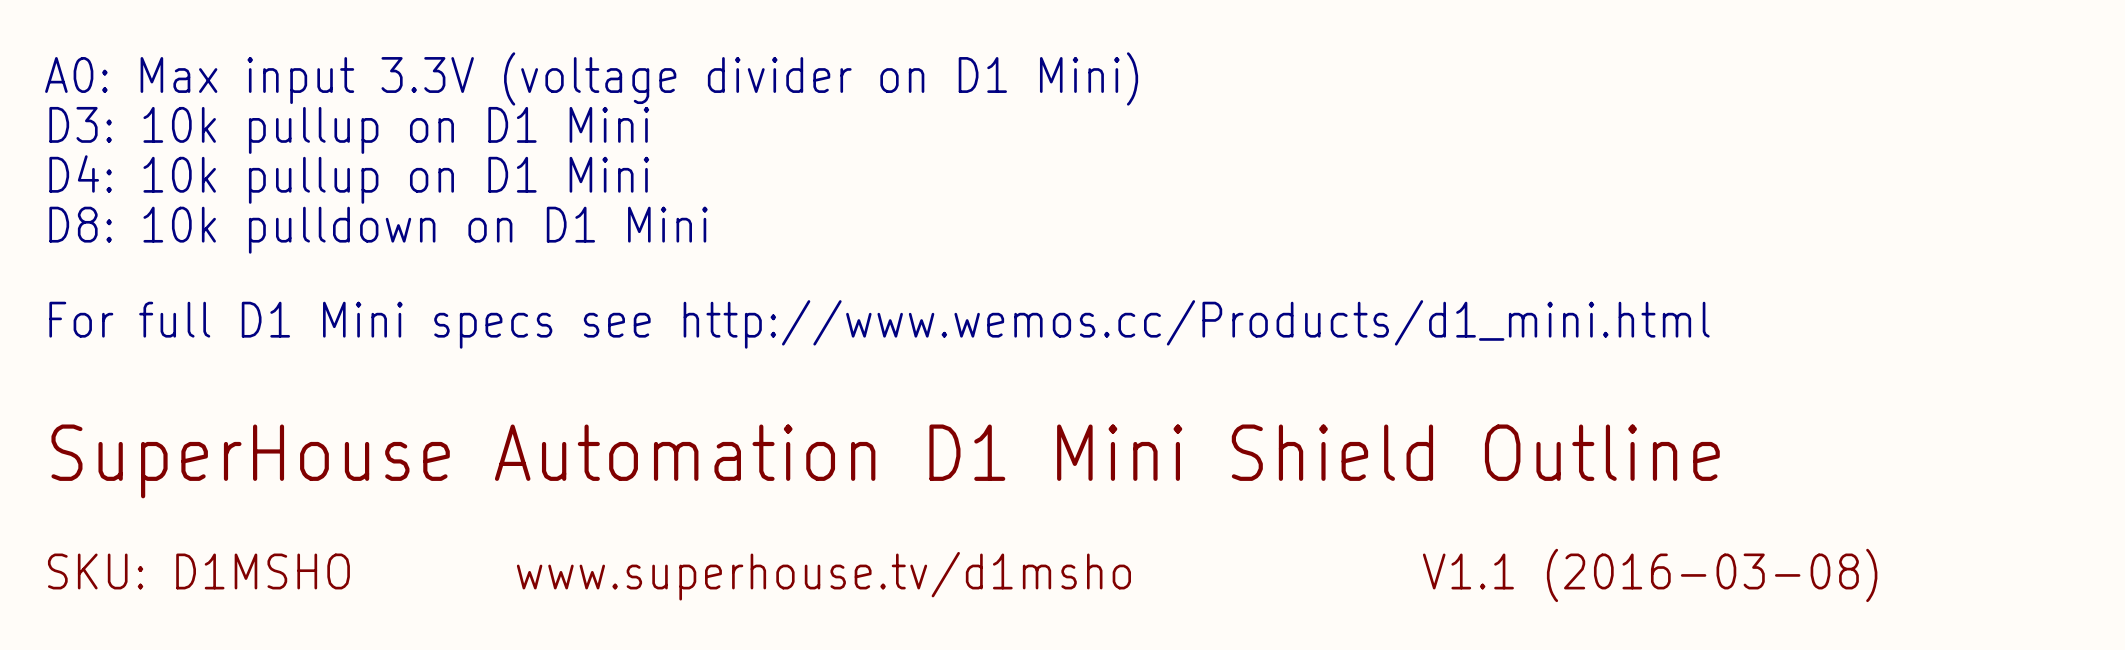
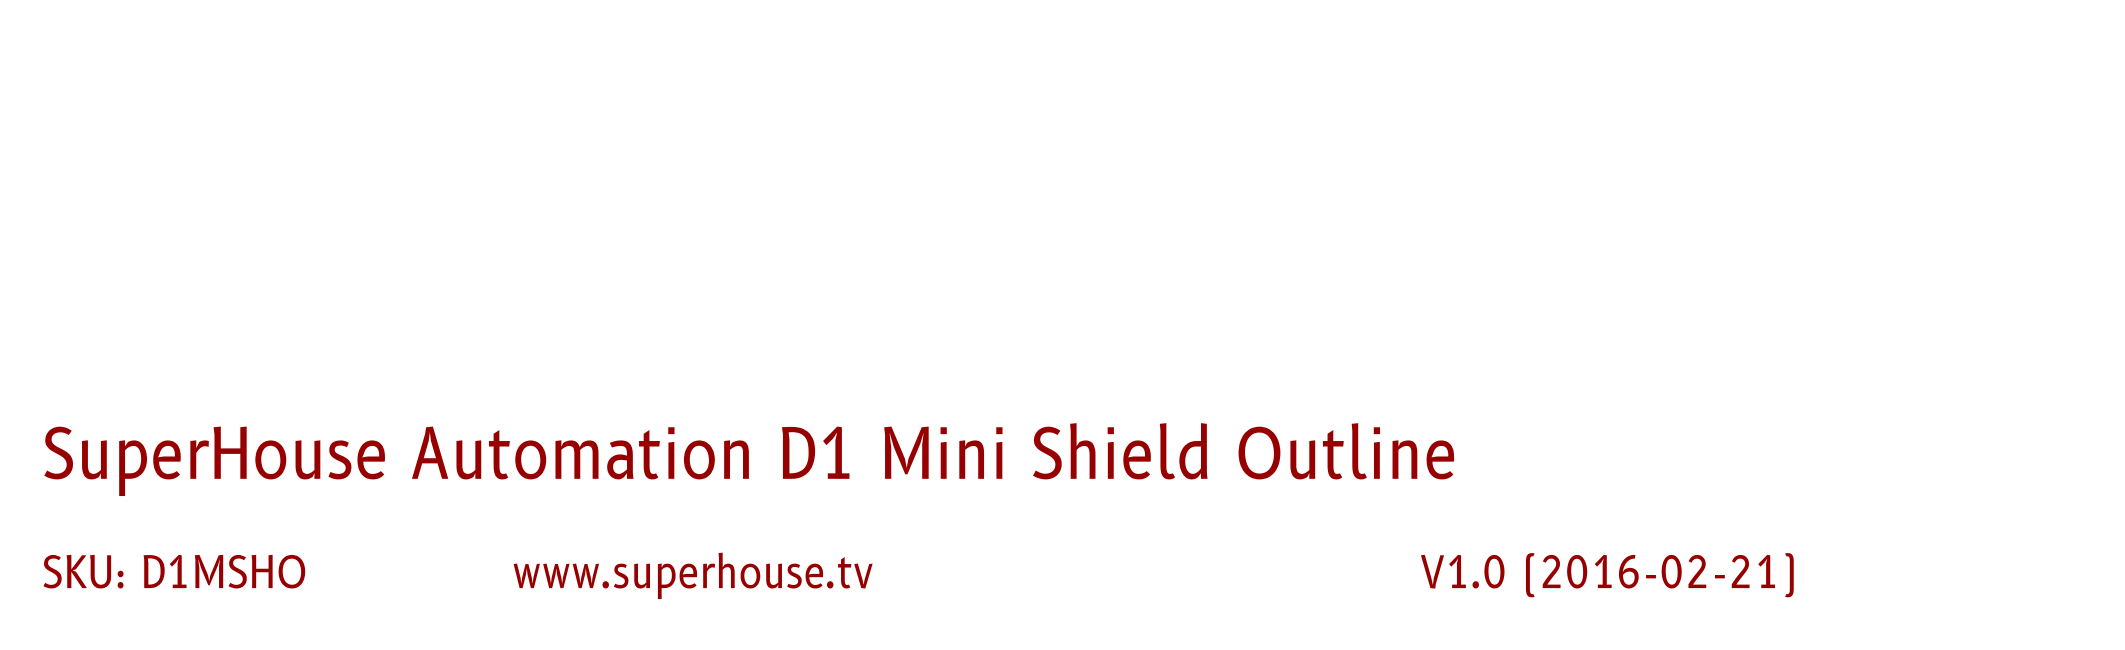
text: A0: Max input 3.3V (voltage divider on D1 Mini) (591, 78) -> none
text: D3: 10k pullup on D1 Mini (349, 130) -> none
text: D4: 10k pullup on D1 Mini (349, 179) -> none
text: D8: 10k pulldown on D1 Mini (378, 230) -> none
text: For full D1 Mini specs see http://www.wemos.cc/Products/d1_mini.html (879, 324) -> none
text: V1.1 (2016-03-08) (1650, 575) -> V1.0 (2016-02-21) (1607, 575)
text: www.superhouse.tv/d1msho (823, 576) -> www.superhouse.tv (693, 575)

